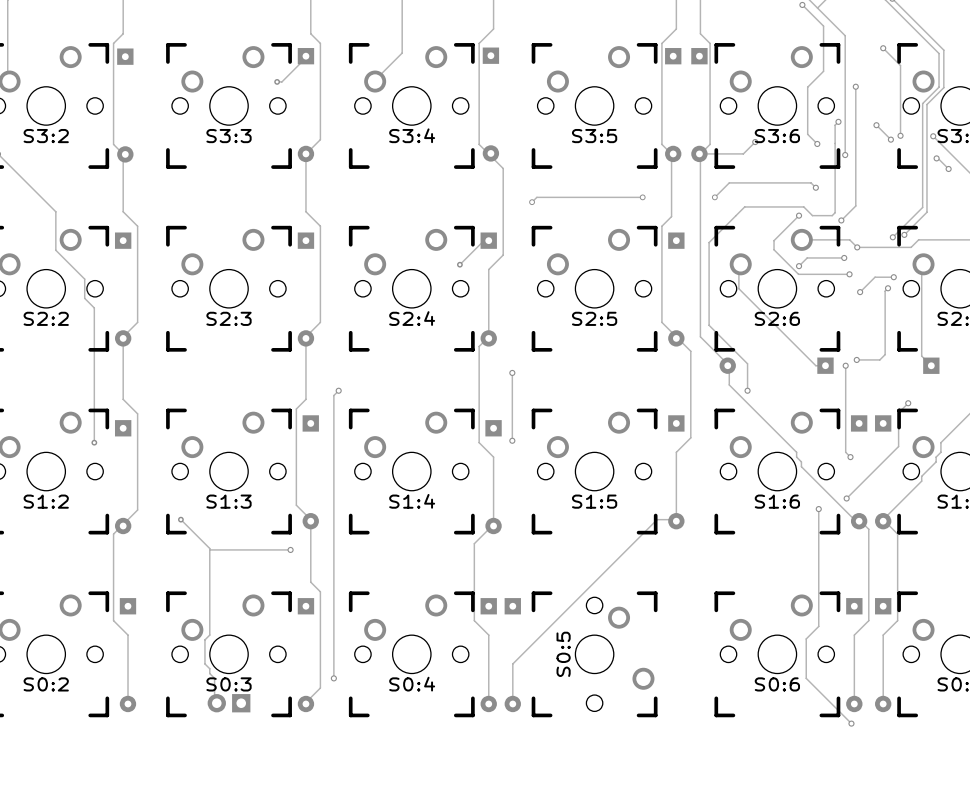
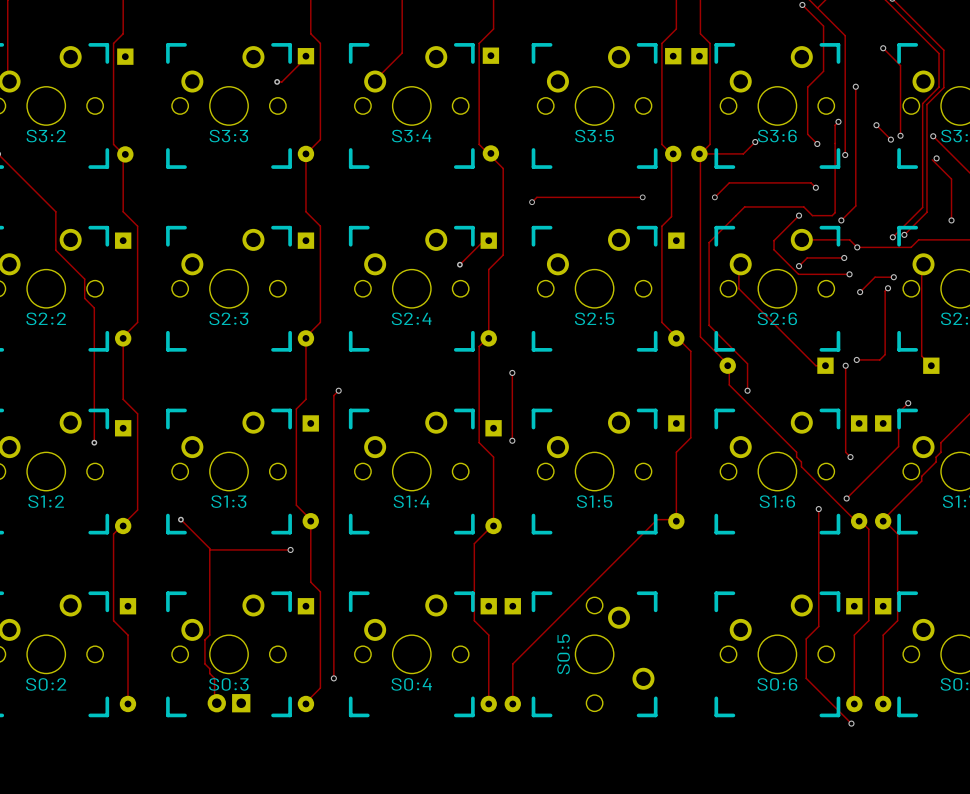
track: (936, 158) (948, 168) -> none
track: none -> (932, 159) (951, 179) (951, 220)
via: (948, 168) -> none
via: none -> (951, 220)

